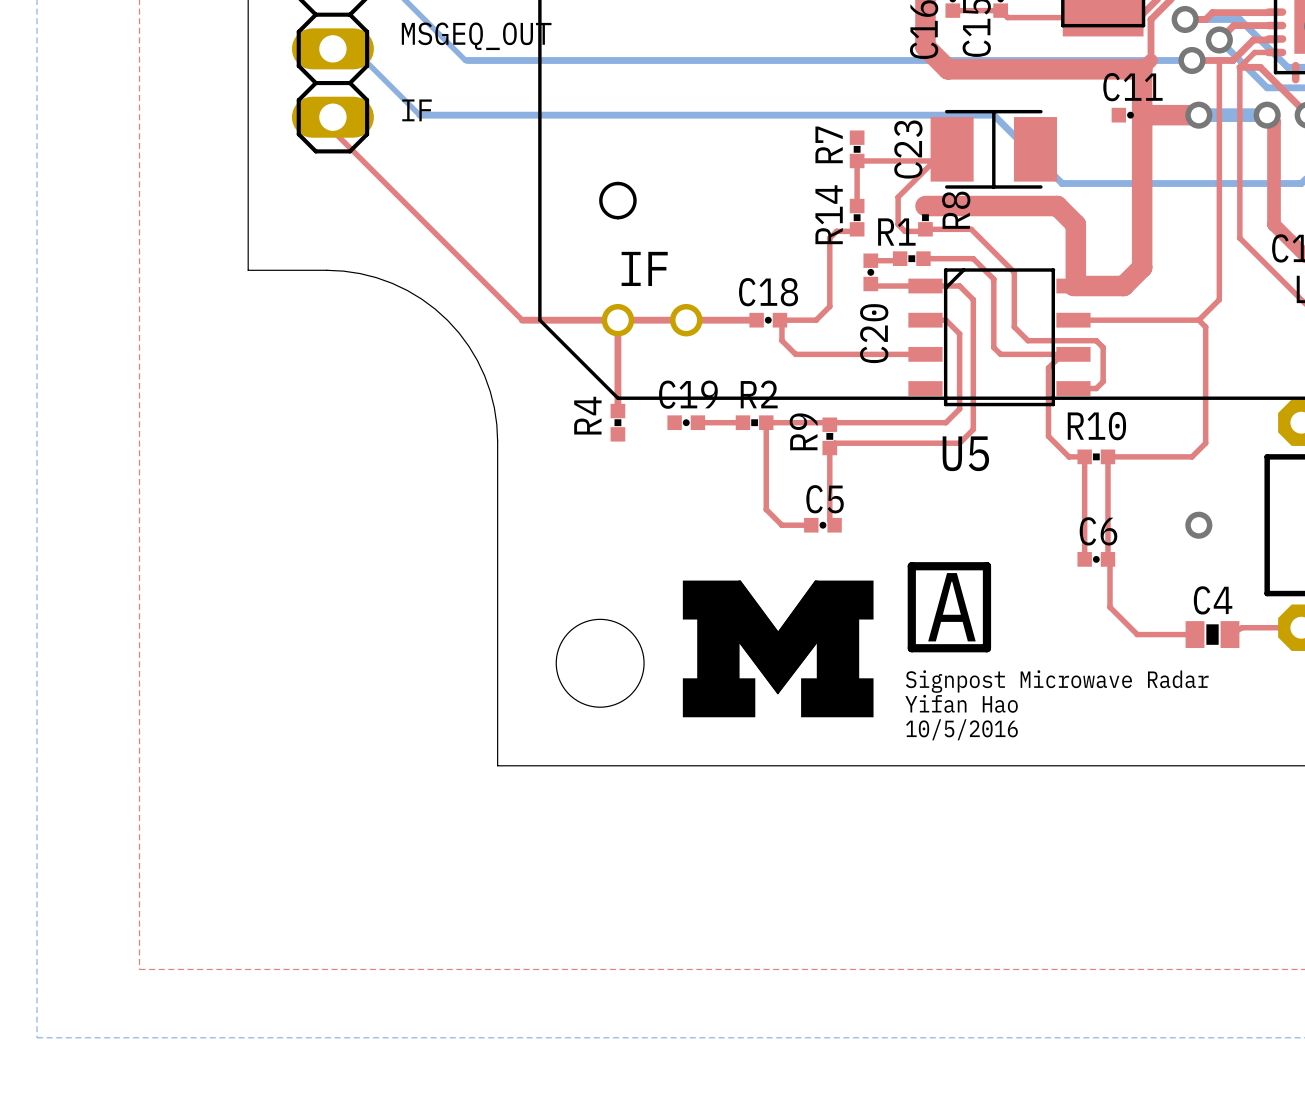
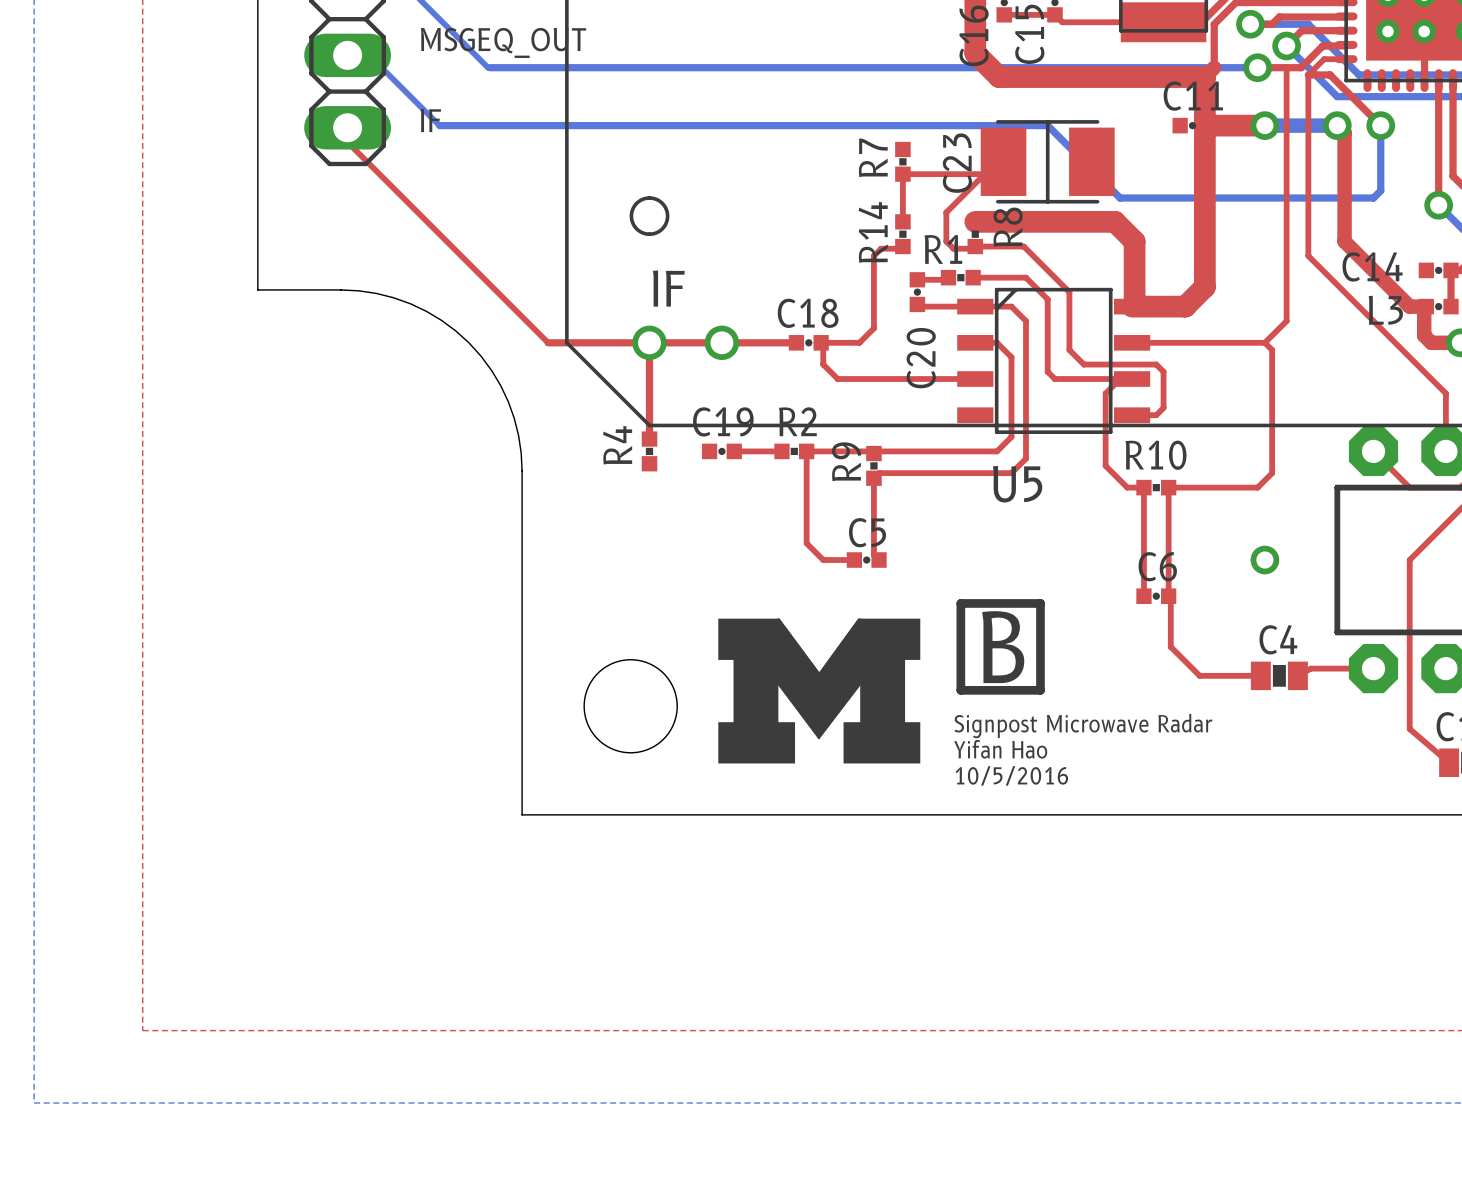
text: A (951, 607) -> B (1003, 647)

